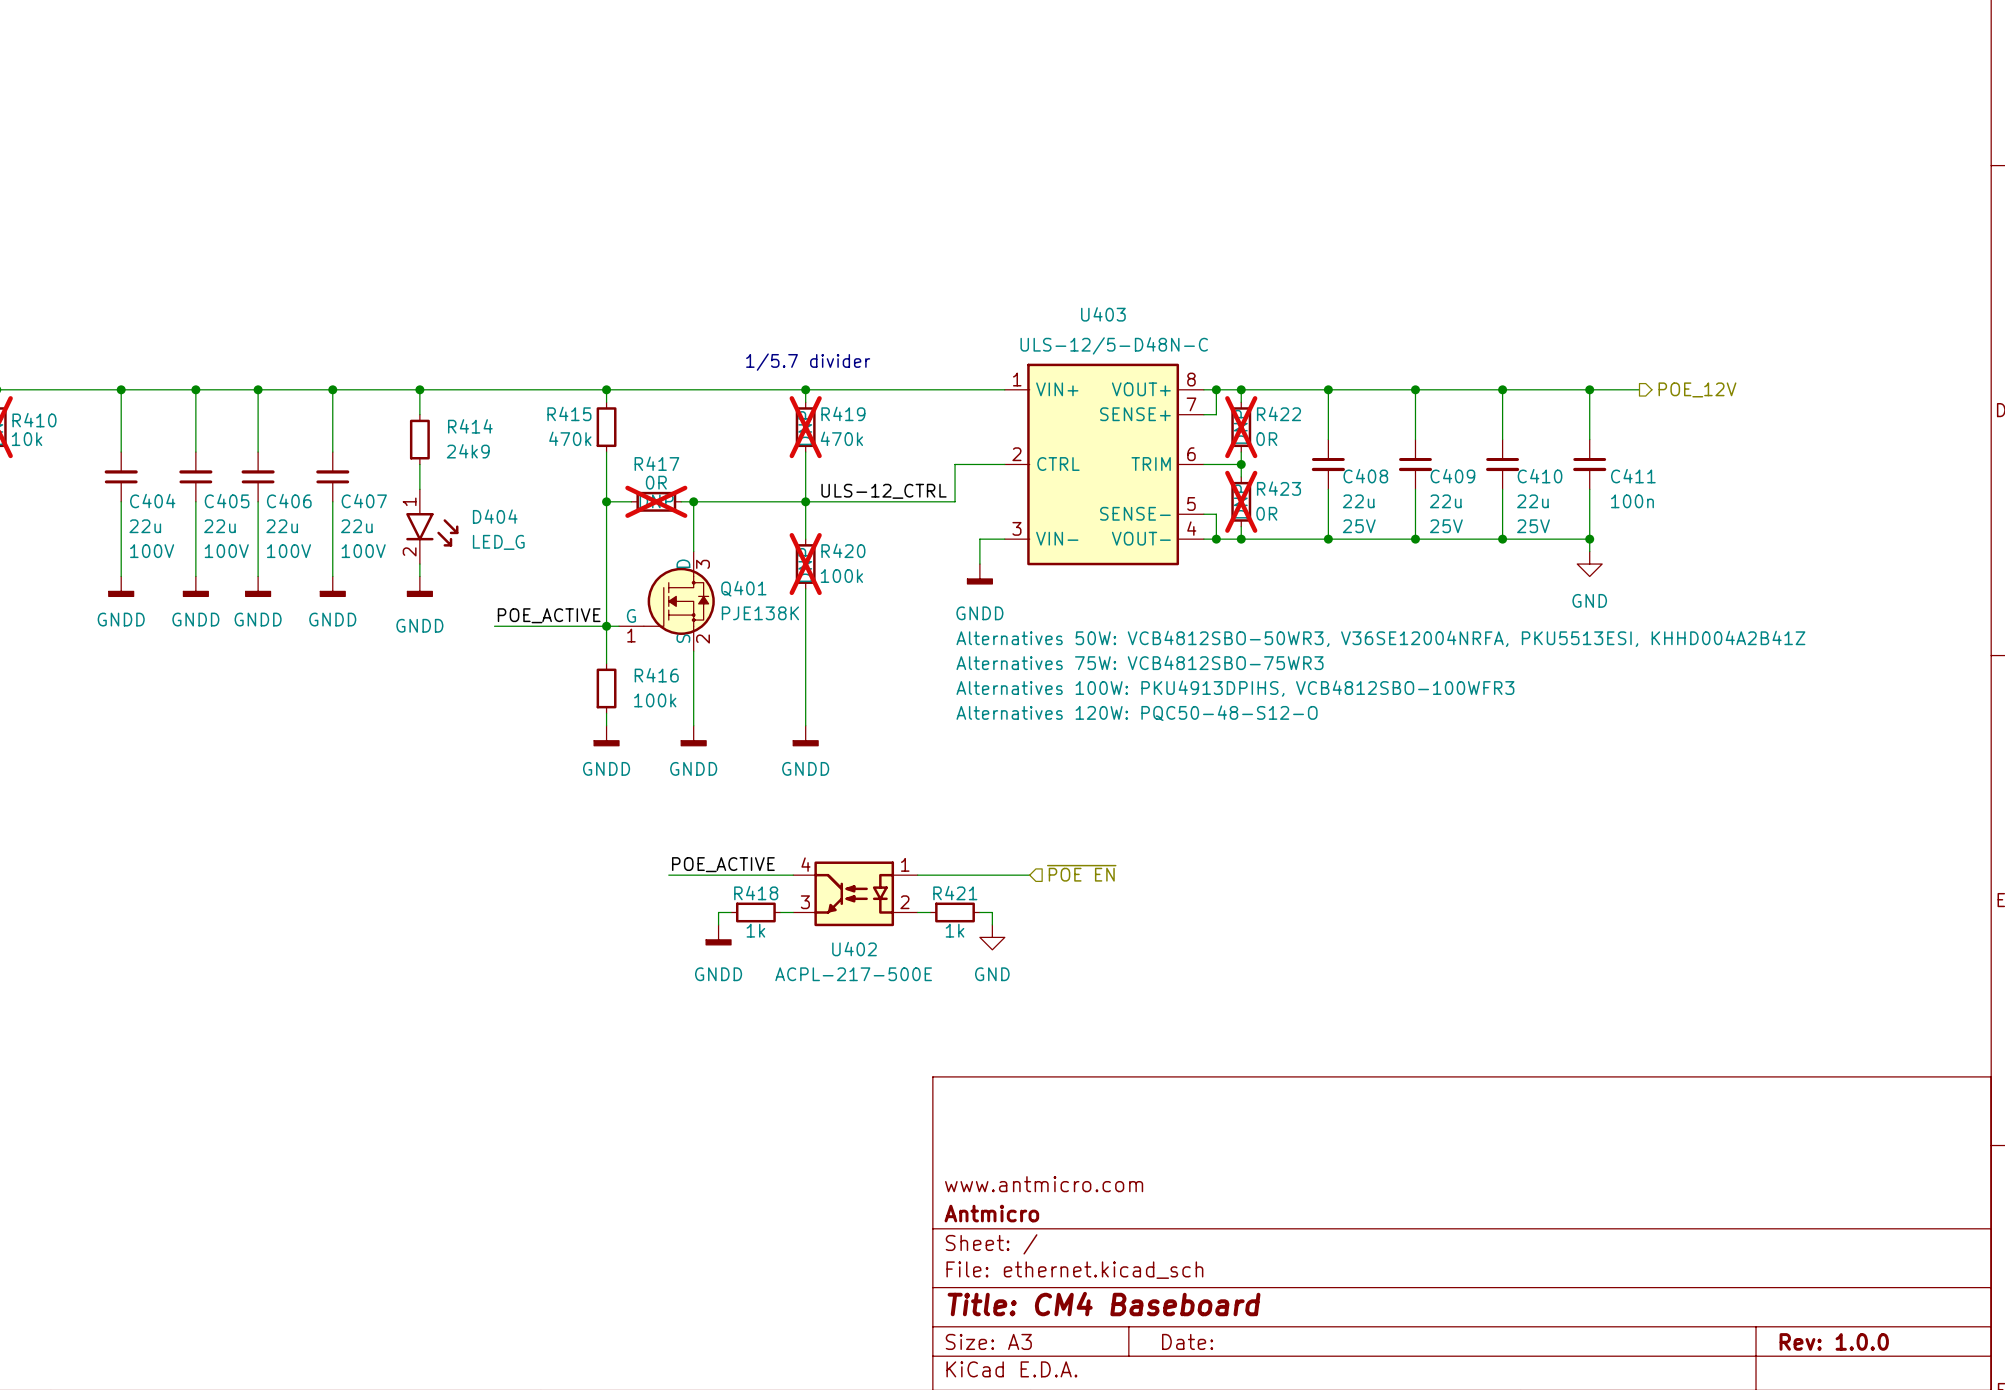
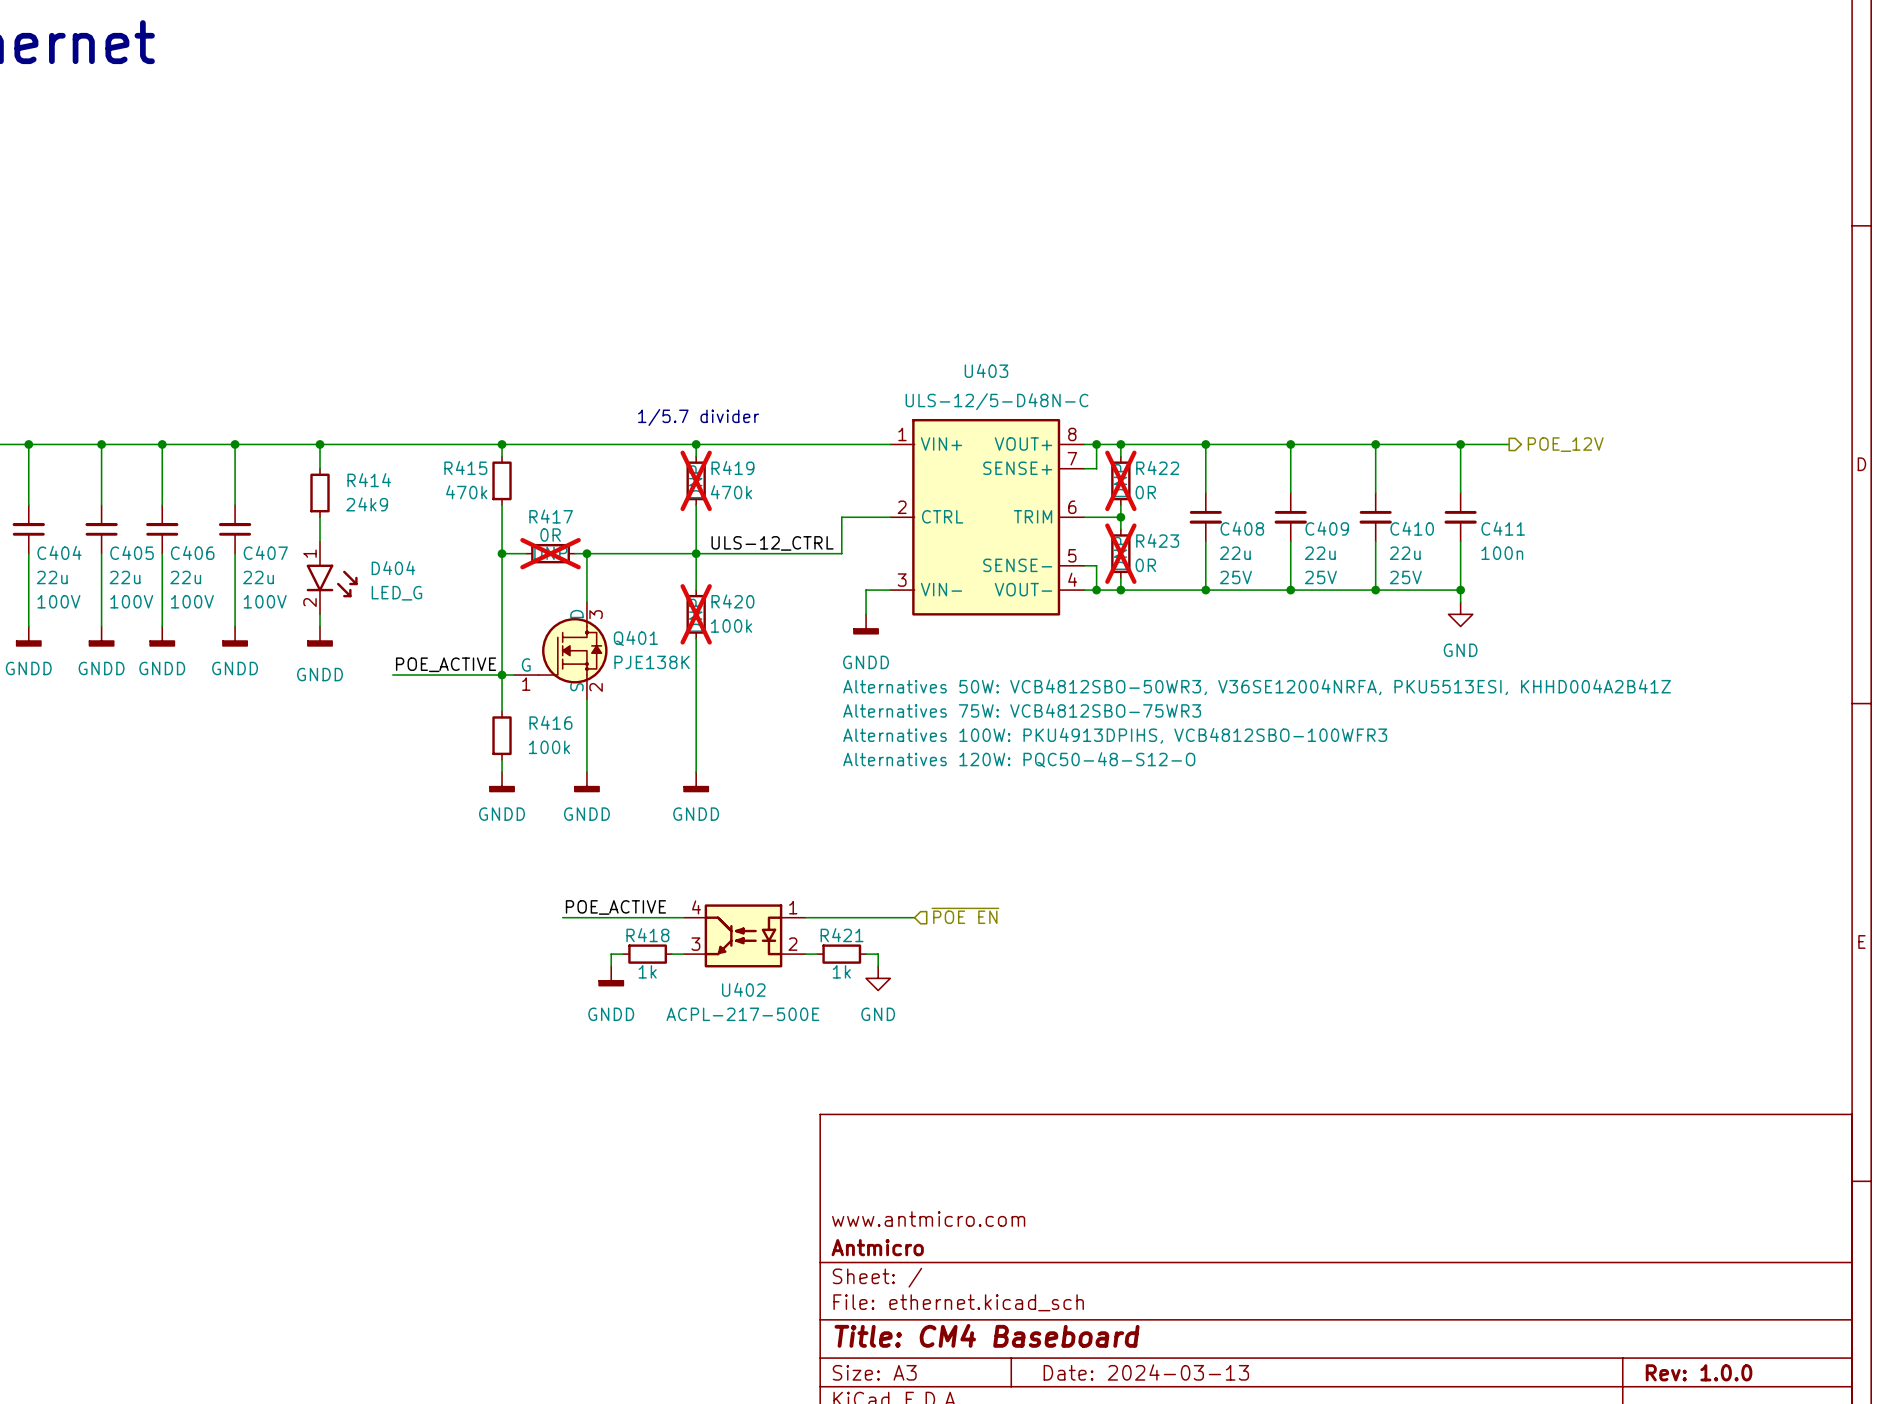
title block: Date: (1187, 1341) -> Date: 2024-03-13 (1146, 1372)

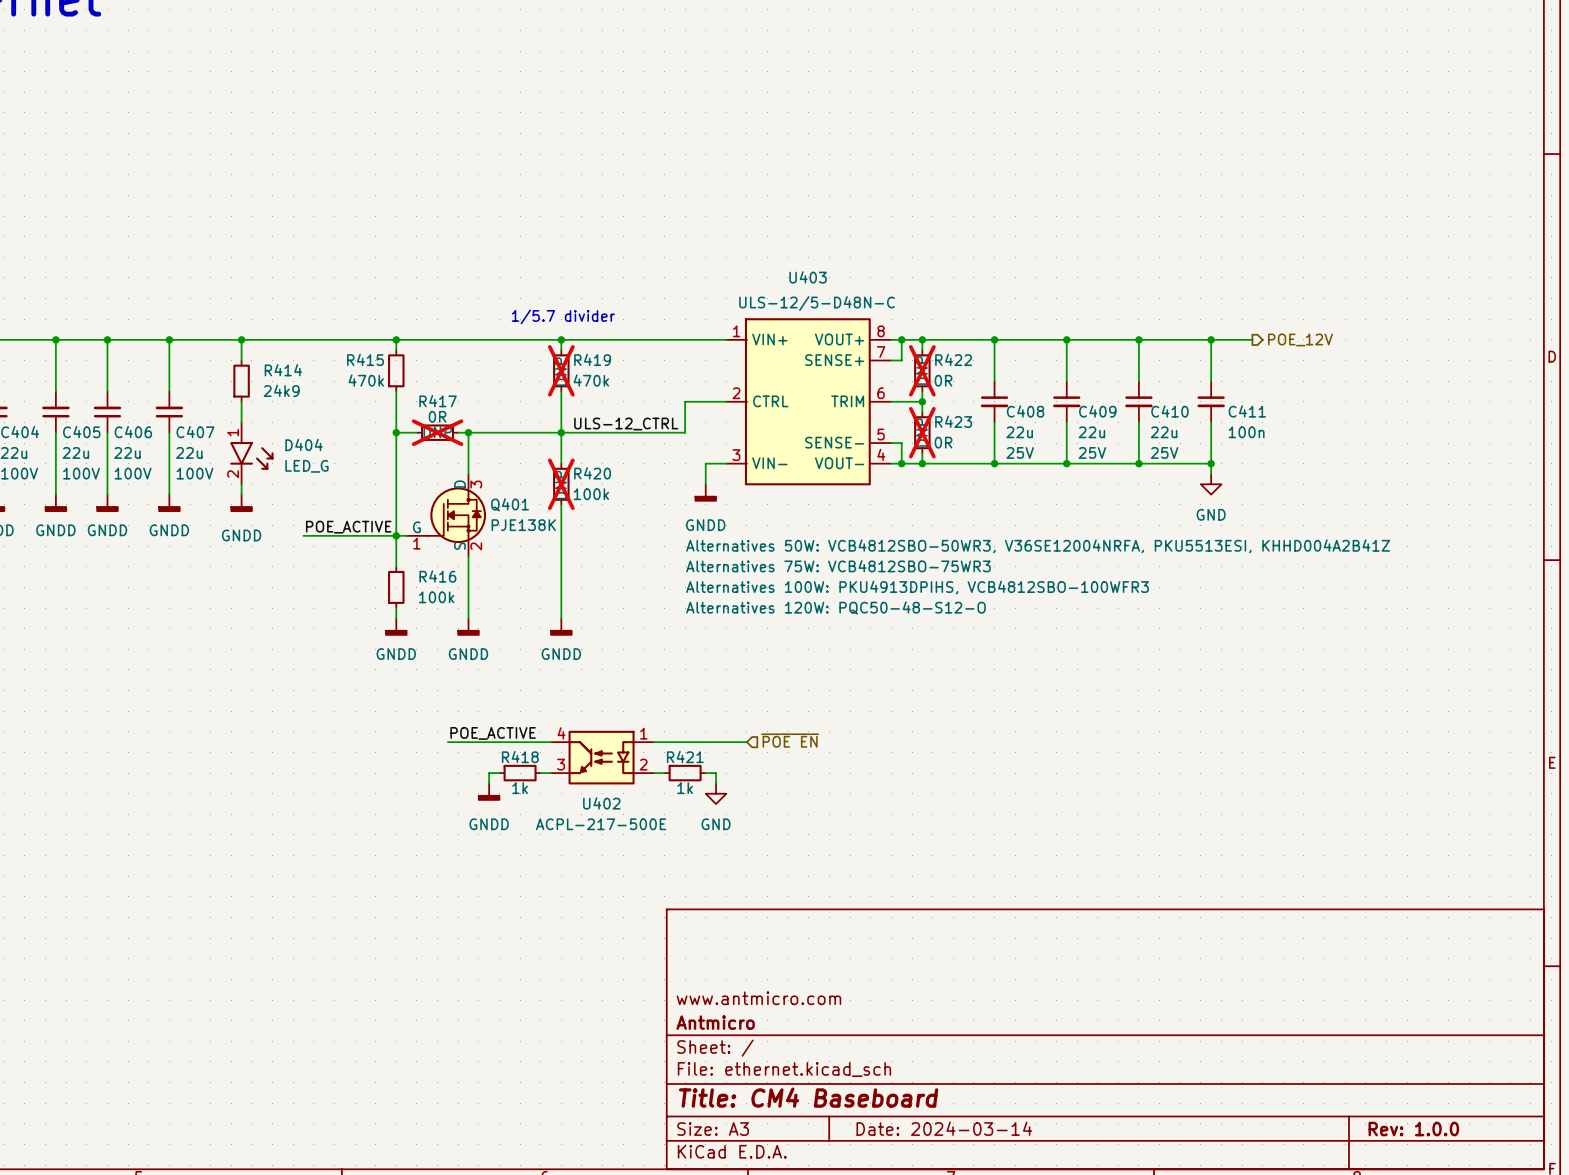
title block: Date: 2024-03-13 (1146, 1372) -> Date: 2024-03-14 (944, 1128)

